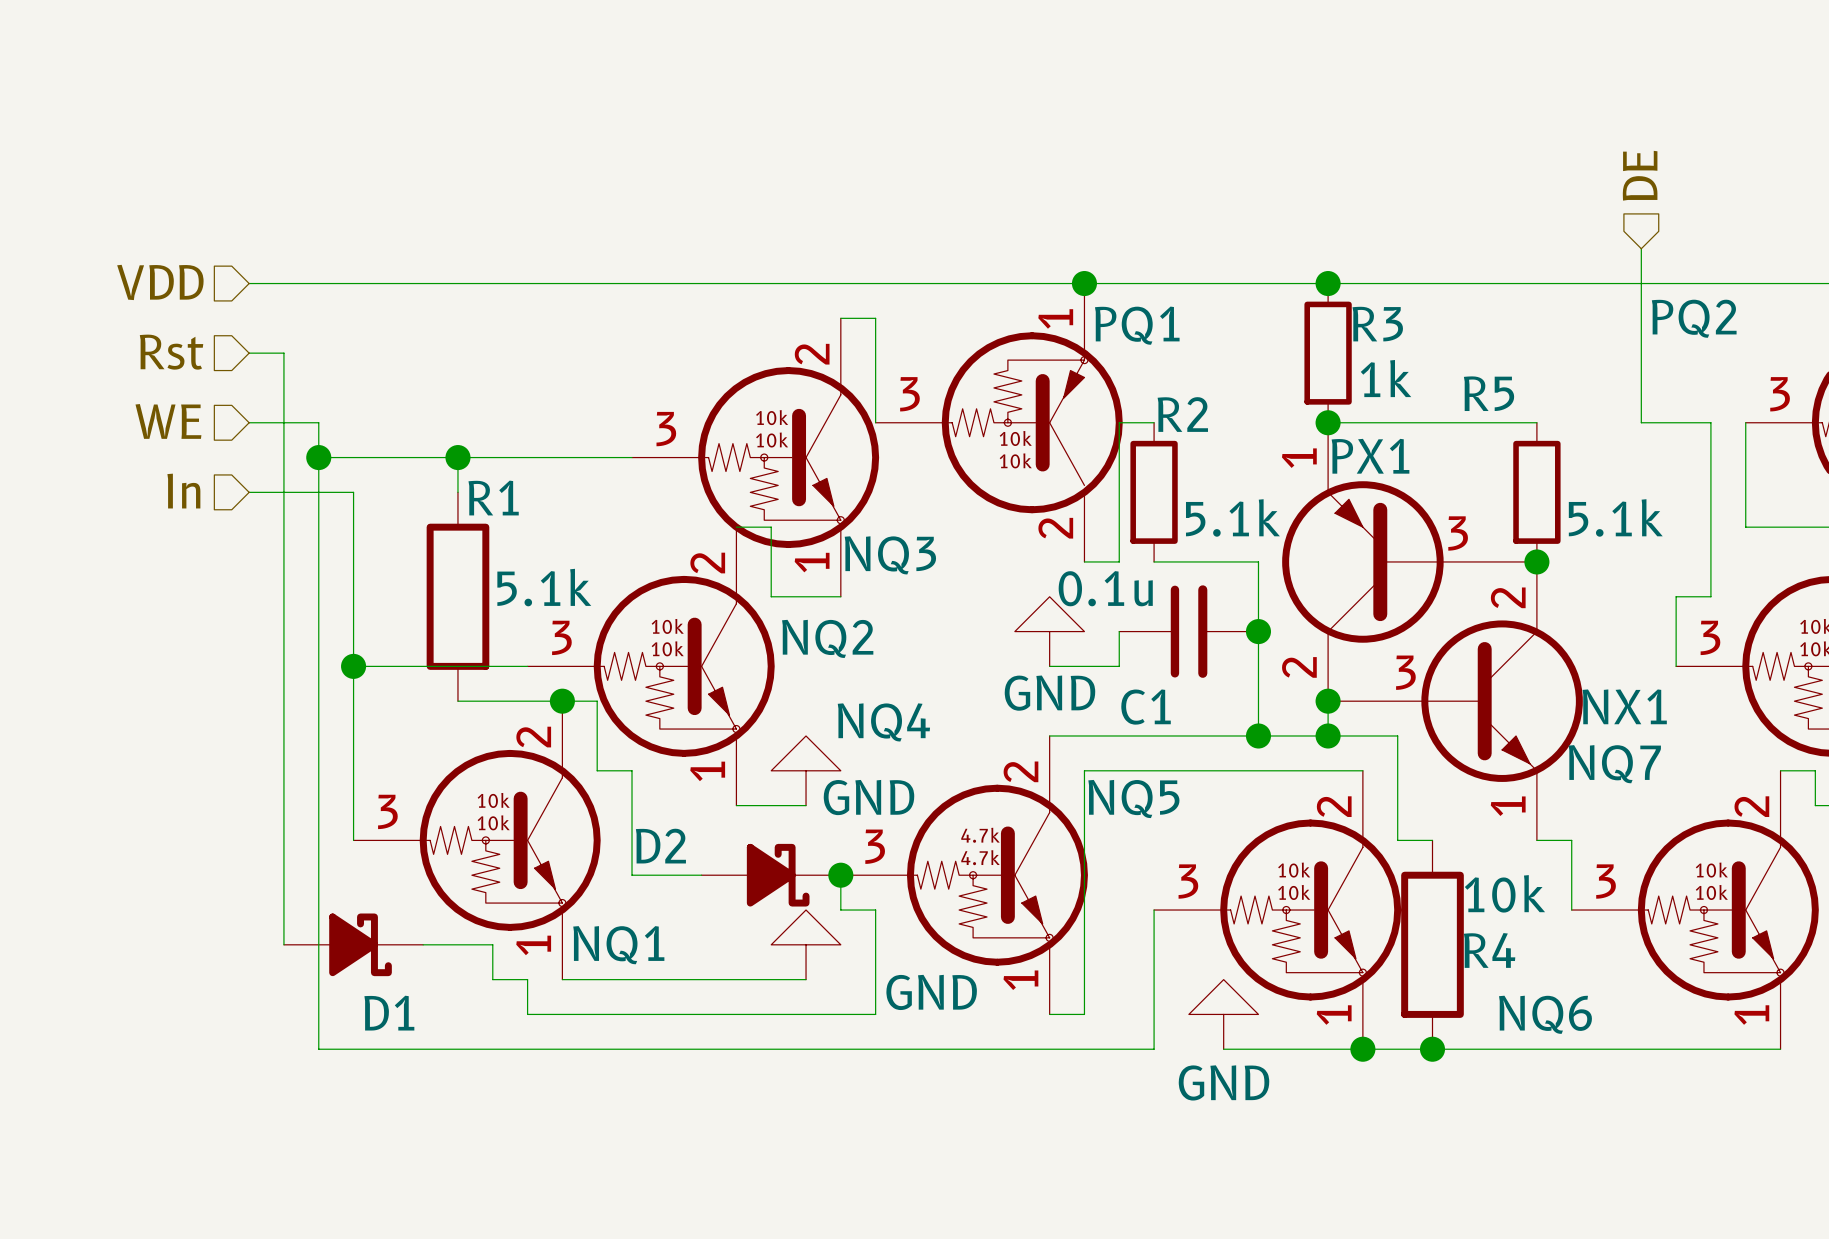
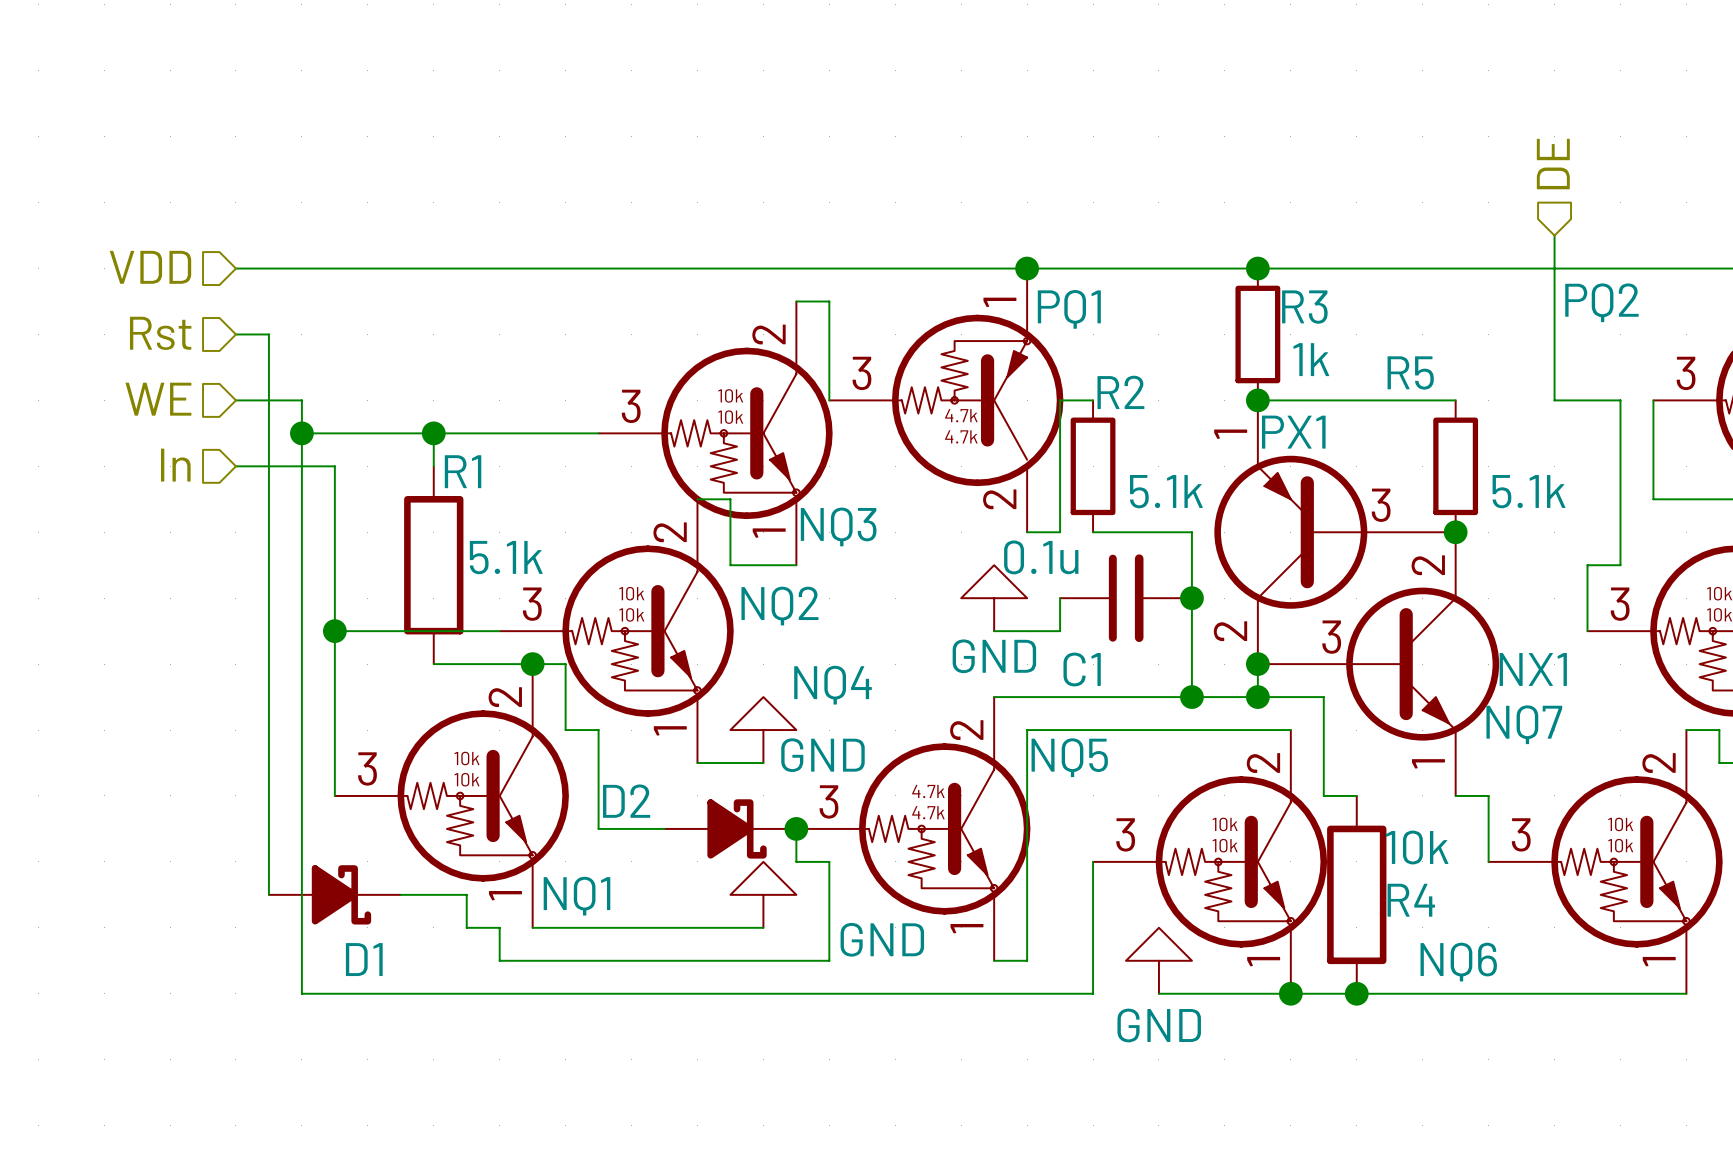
PQ1 text: 10k (1015, 438) -> 4.7k (961, 415)
PQ1 text: 10k (1015, 460) -> 4.7k (961, 436)

